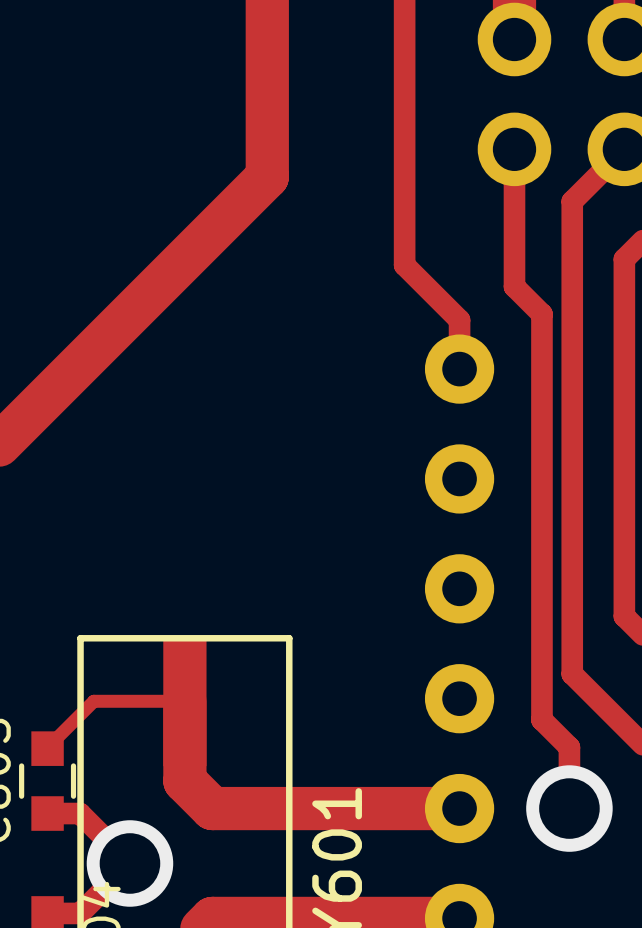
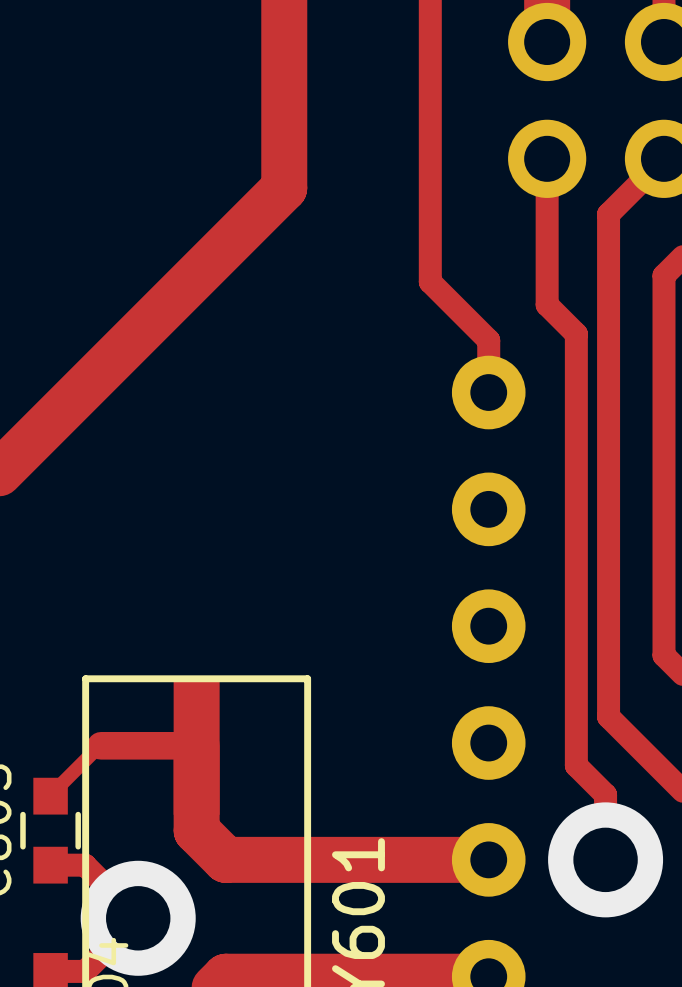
track width: thin (94, 701) (184, 701) -> thick (100, 745) (196, 745)
via size: [526, 765, 613, 852] -> [548, 802, 664, 918]
via size: [86, 820, 174, 907] -> [80, 860, 196, 976]

